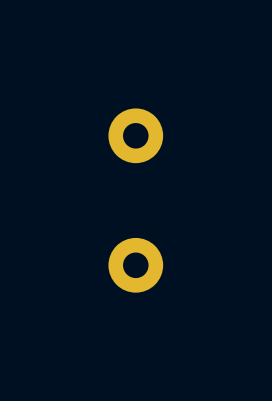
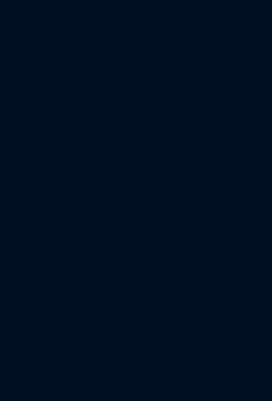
part: (135, 135) -> none
part: (135, 265) -> none

